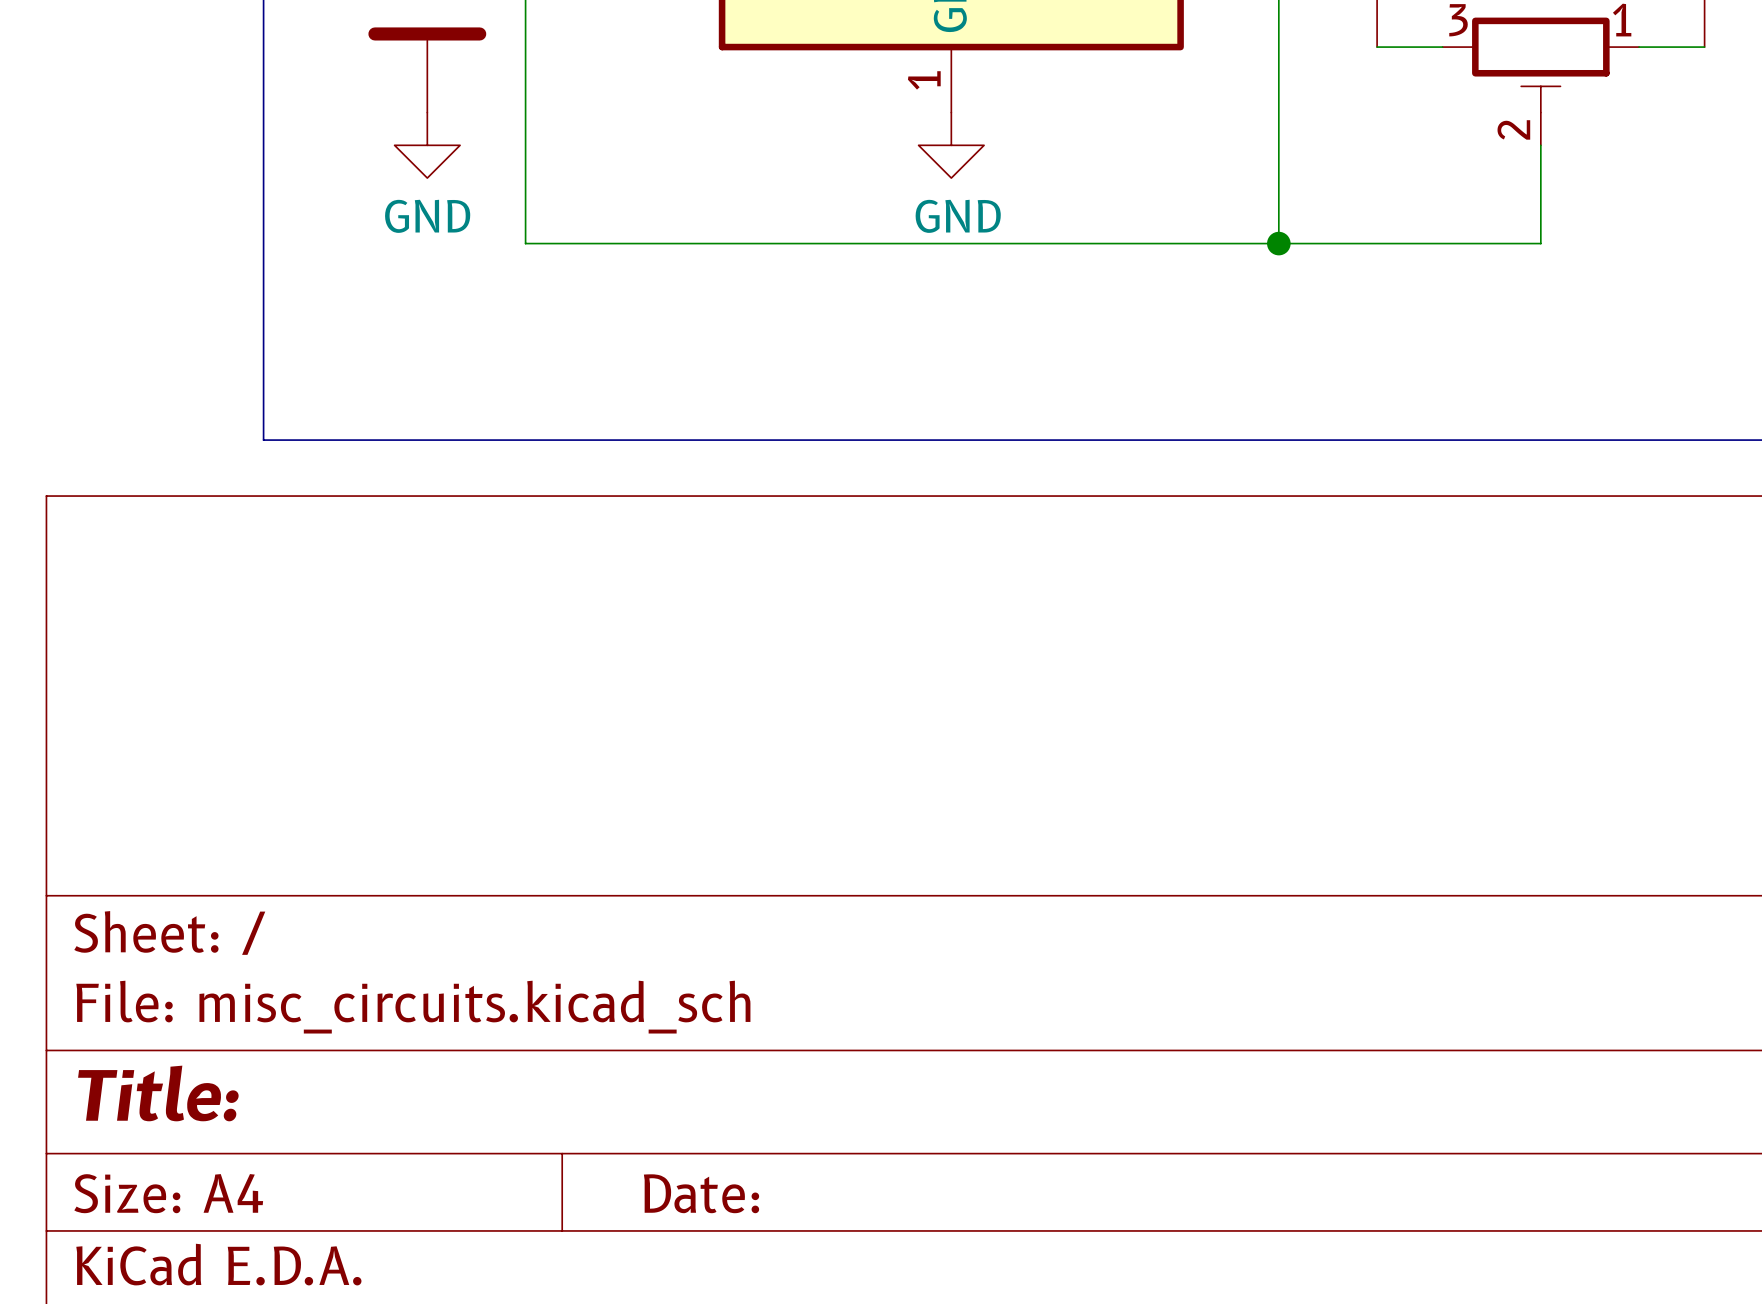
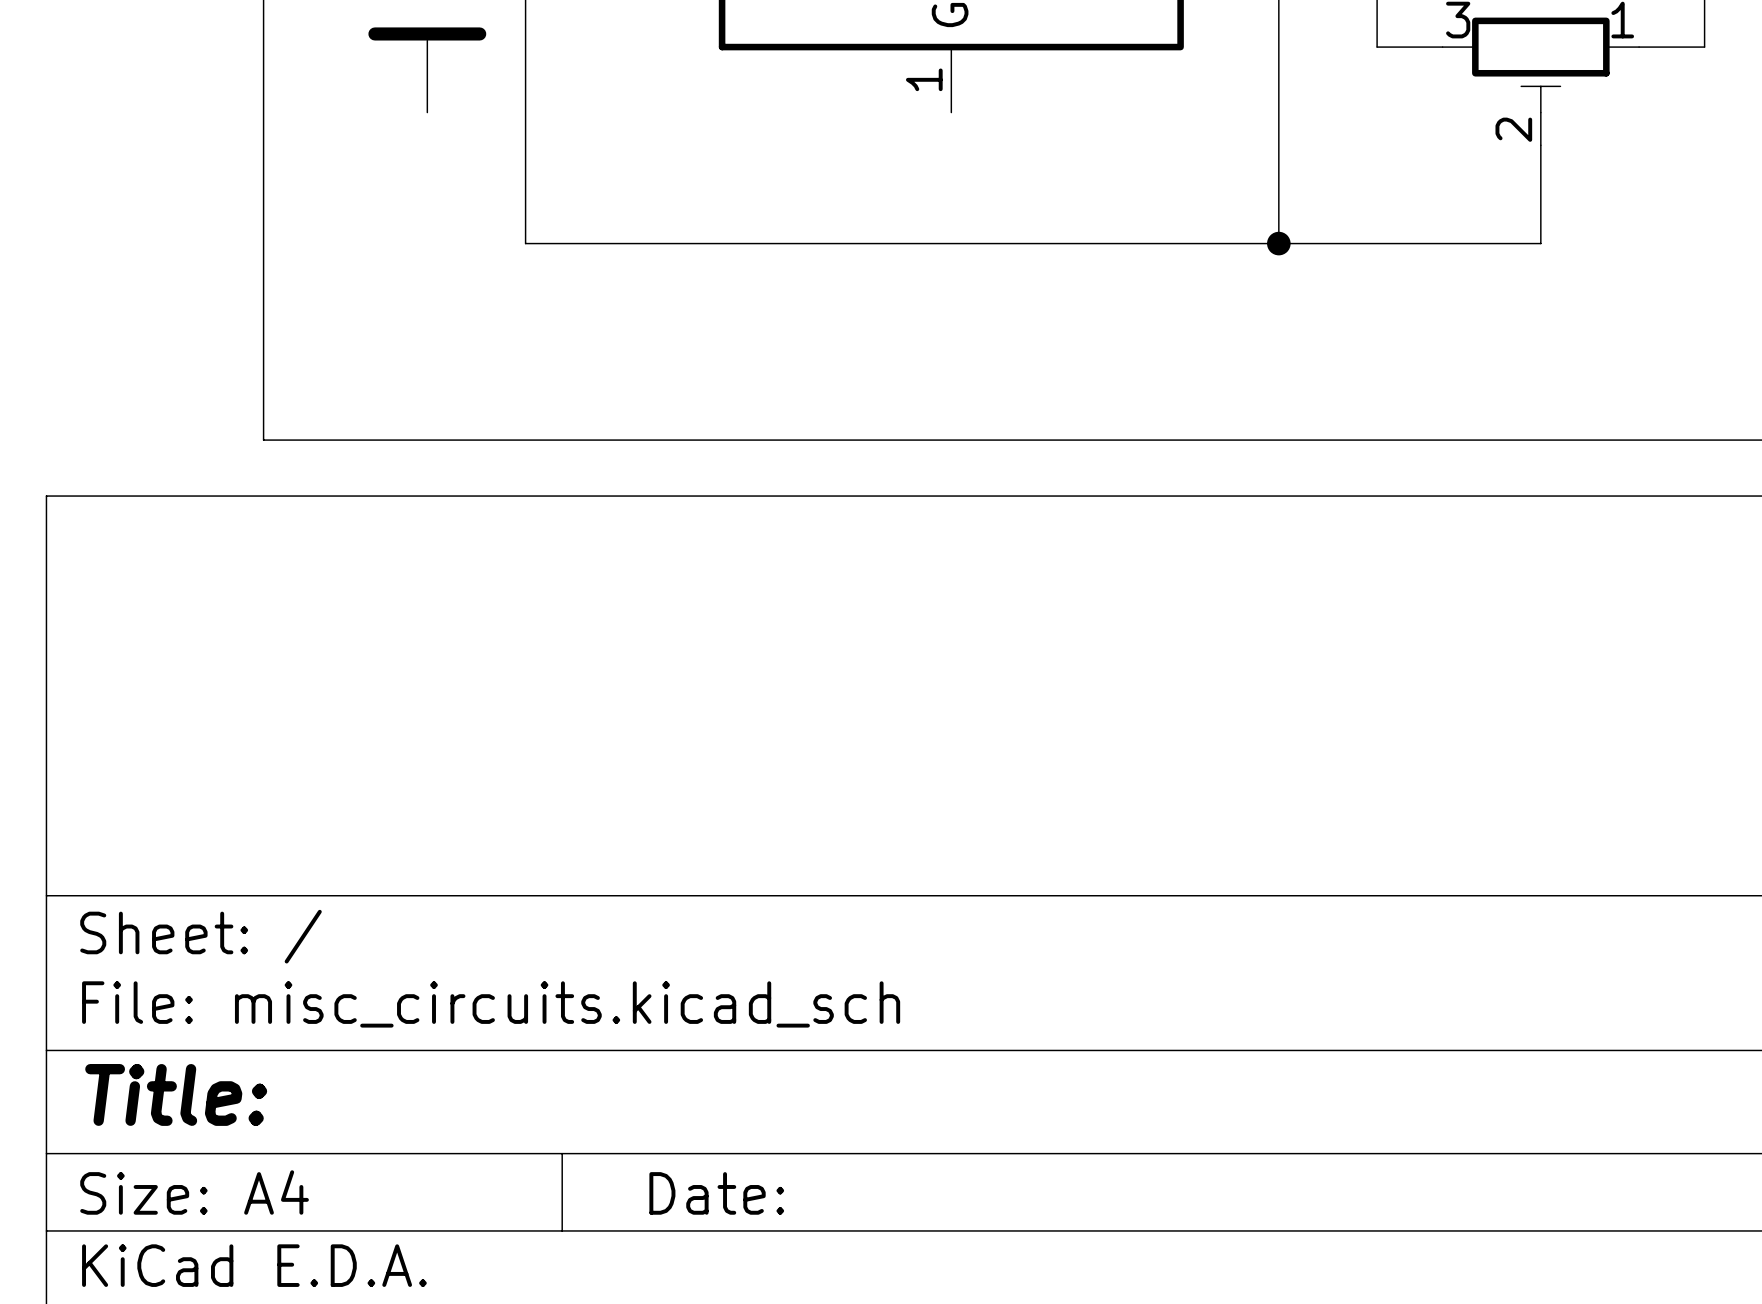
power symbol: GND (427, 145) -> none
power symbol: GND (951, 145) -> none

